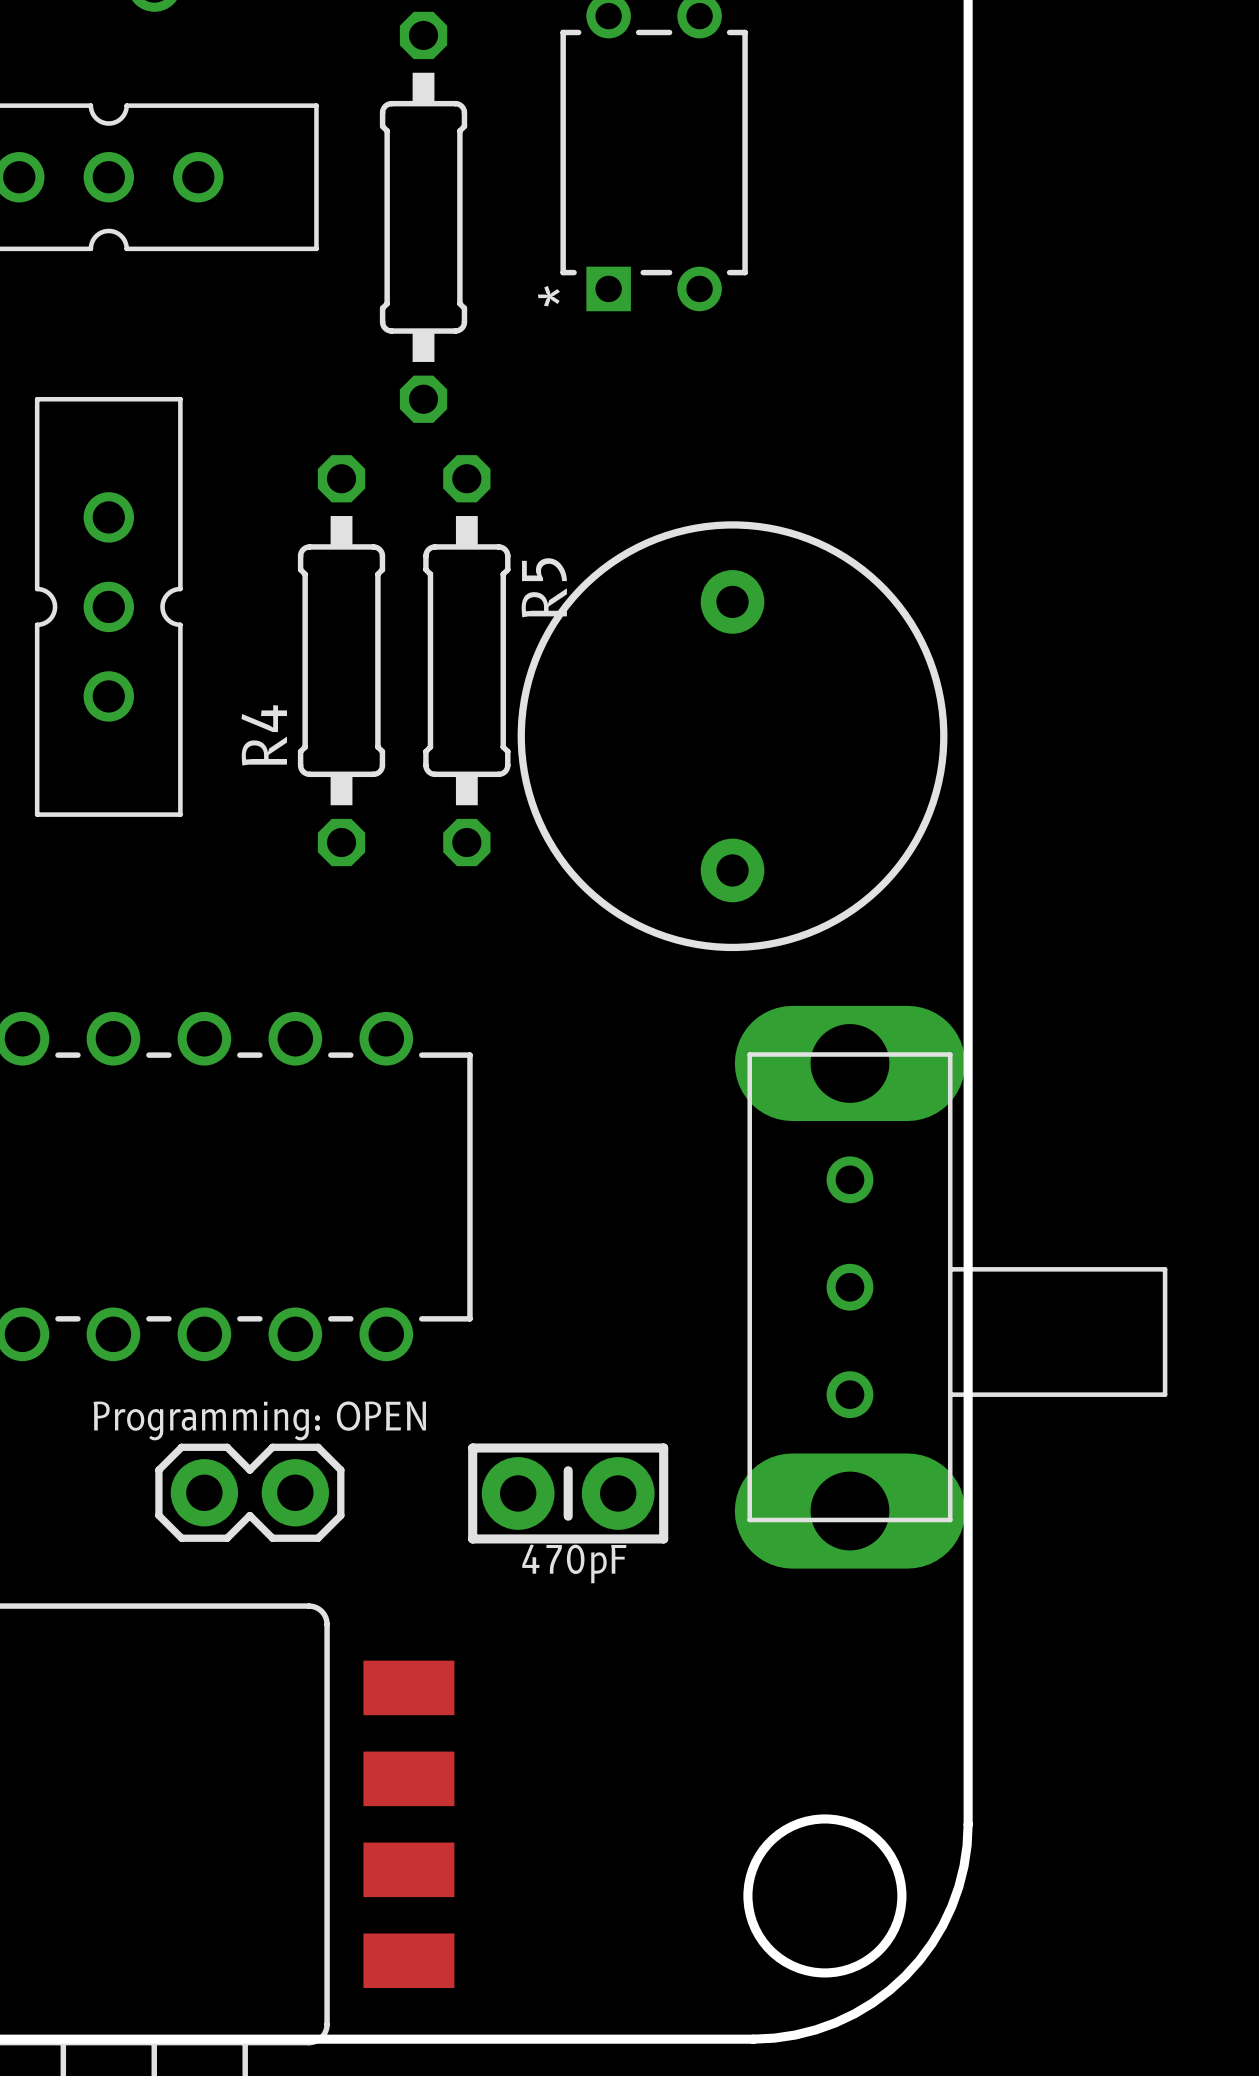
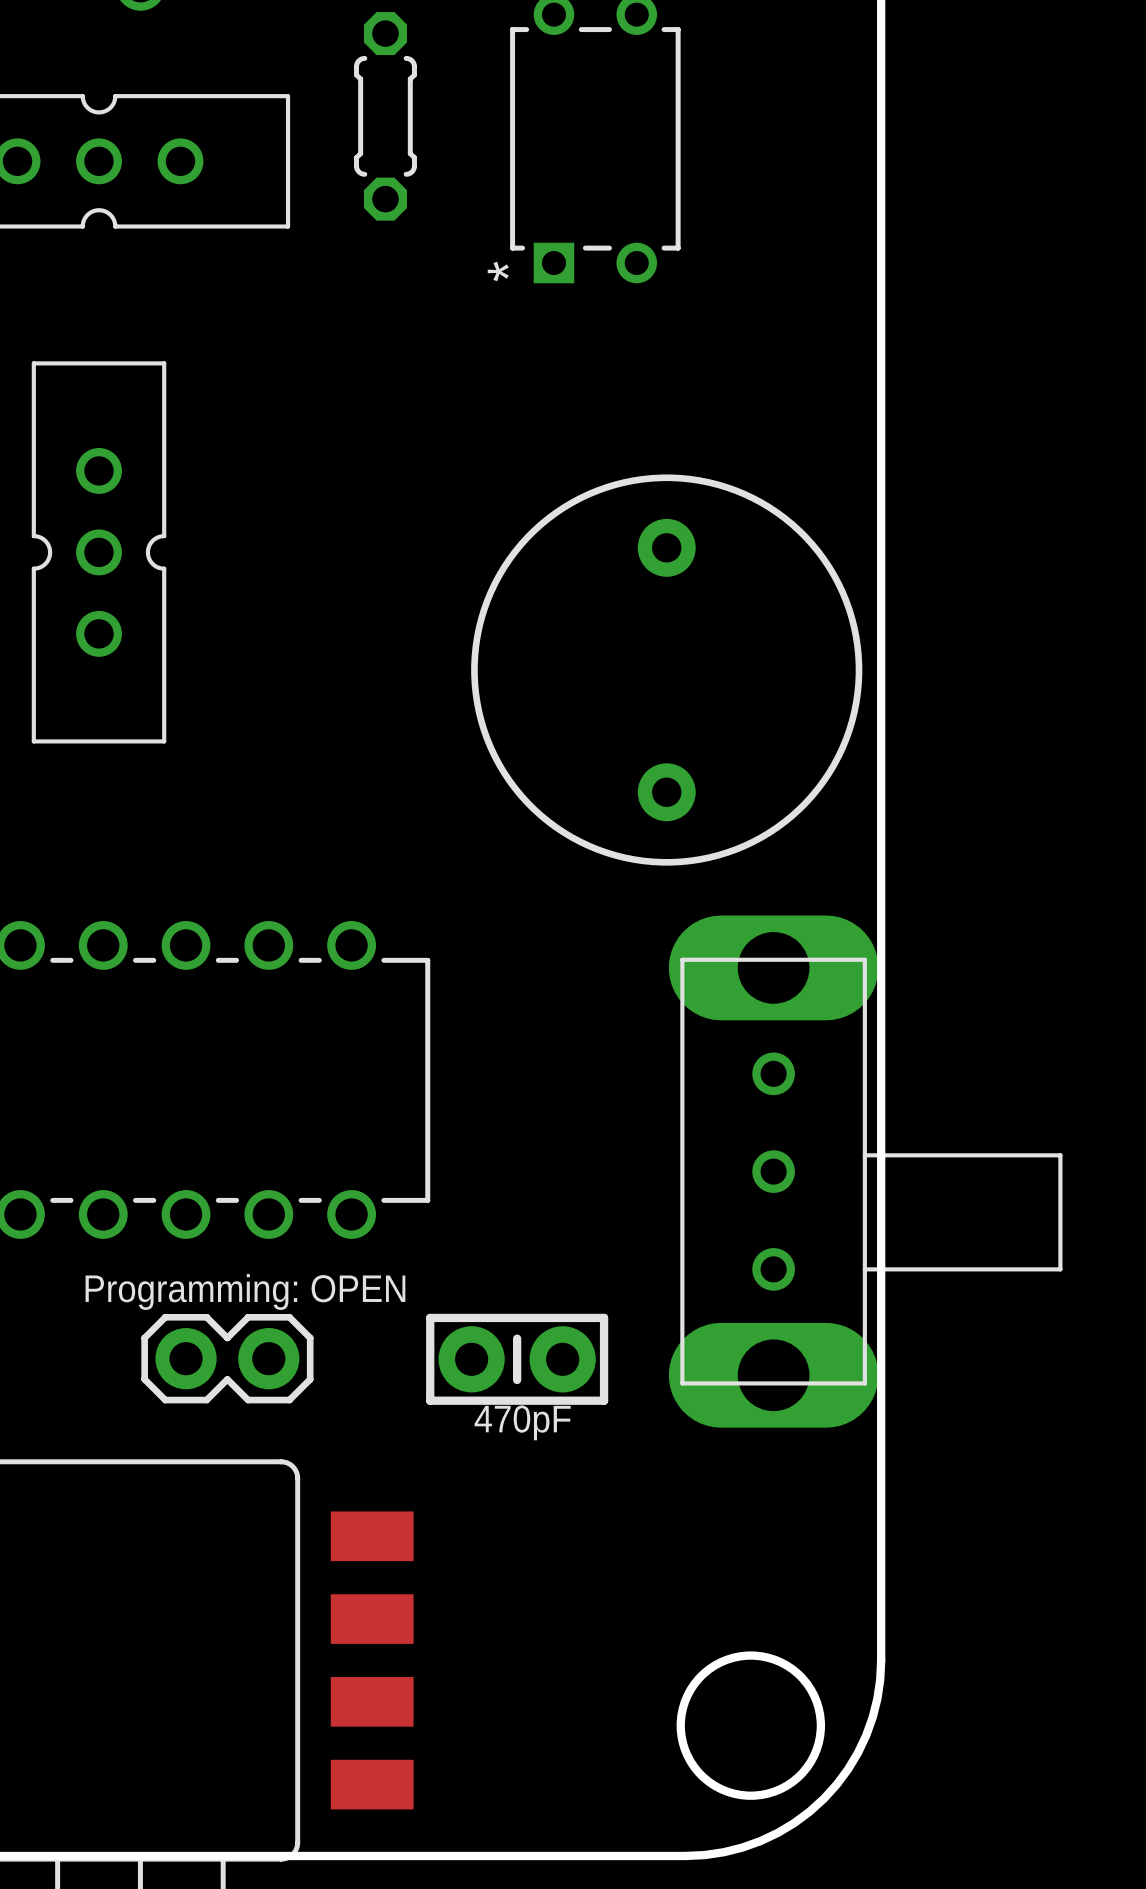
part: none -> (385, 116)
part: (423, 217) -> none
R4: (341, 660) -> none
R5: (466, 660) -> none

